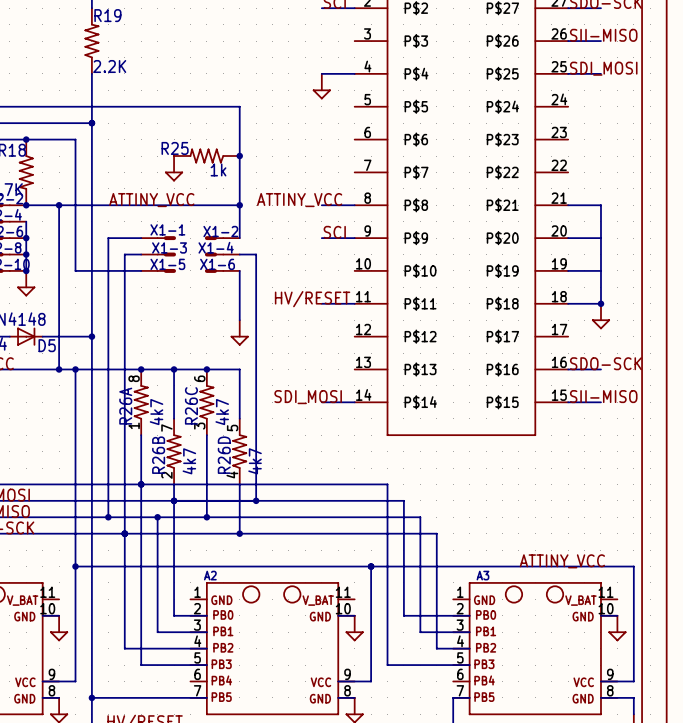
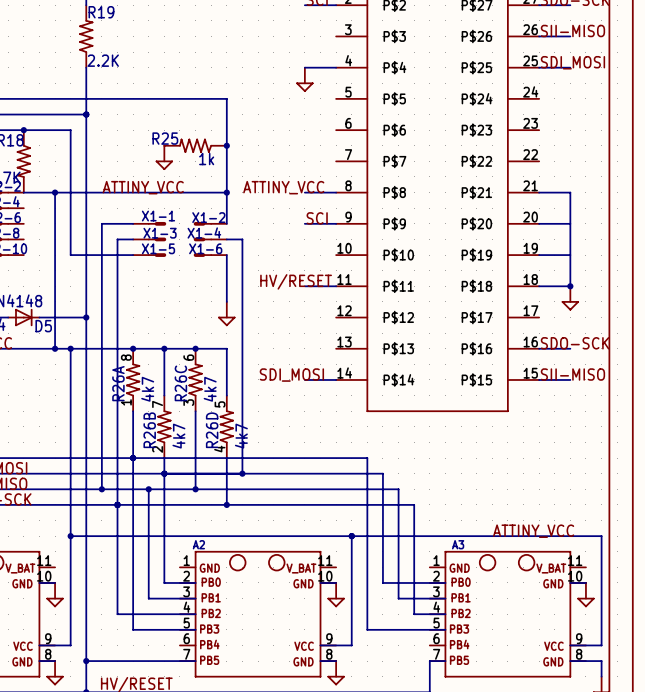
junction: (26, 205) -> none
wire: (26, 221) (26, 270) -> none
junction: (26, 238) -> none
junction: (26, 254) -> none
junction: (26, 270) -> none
power symbol: (26, 283) -> none

